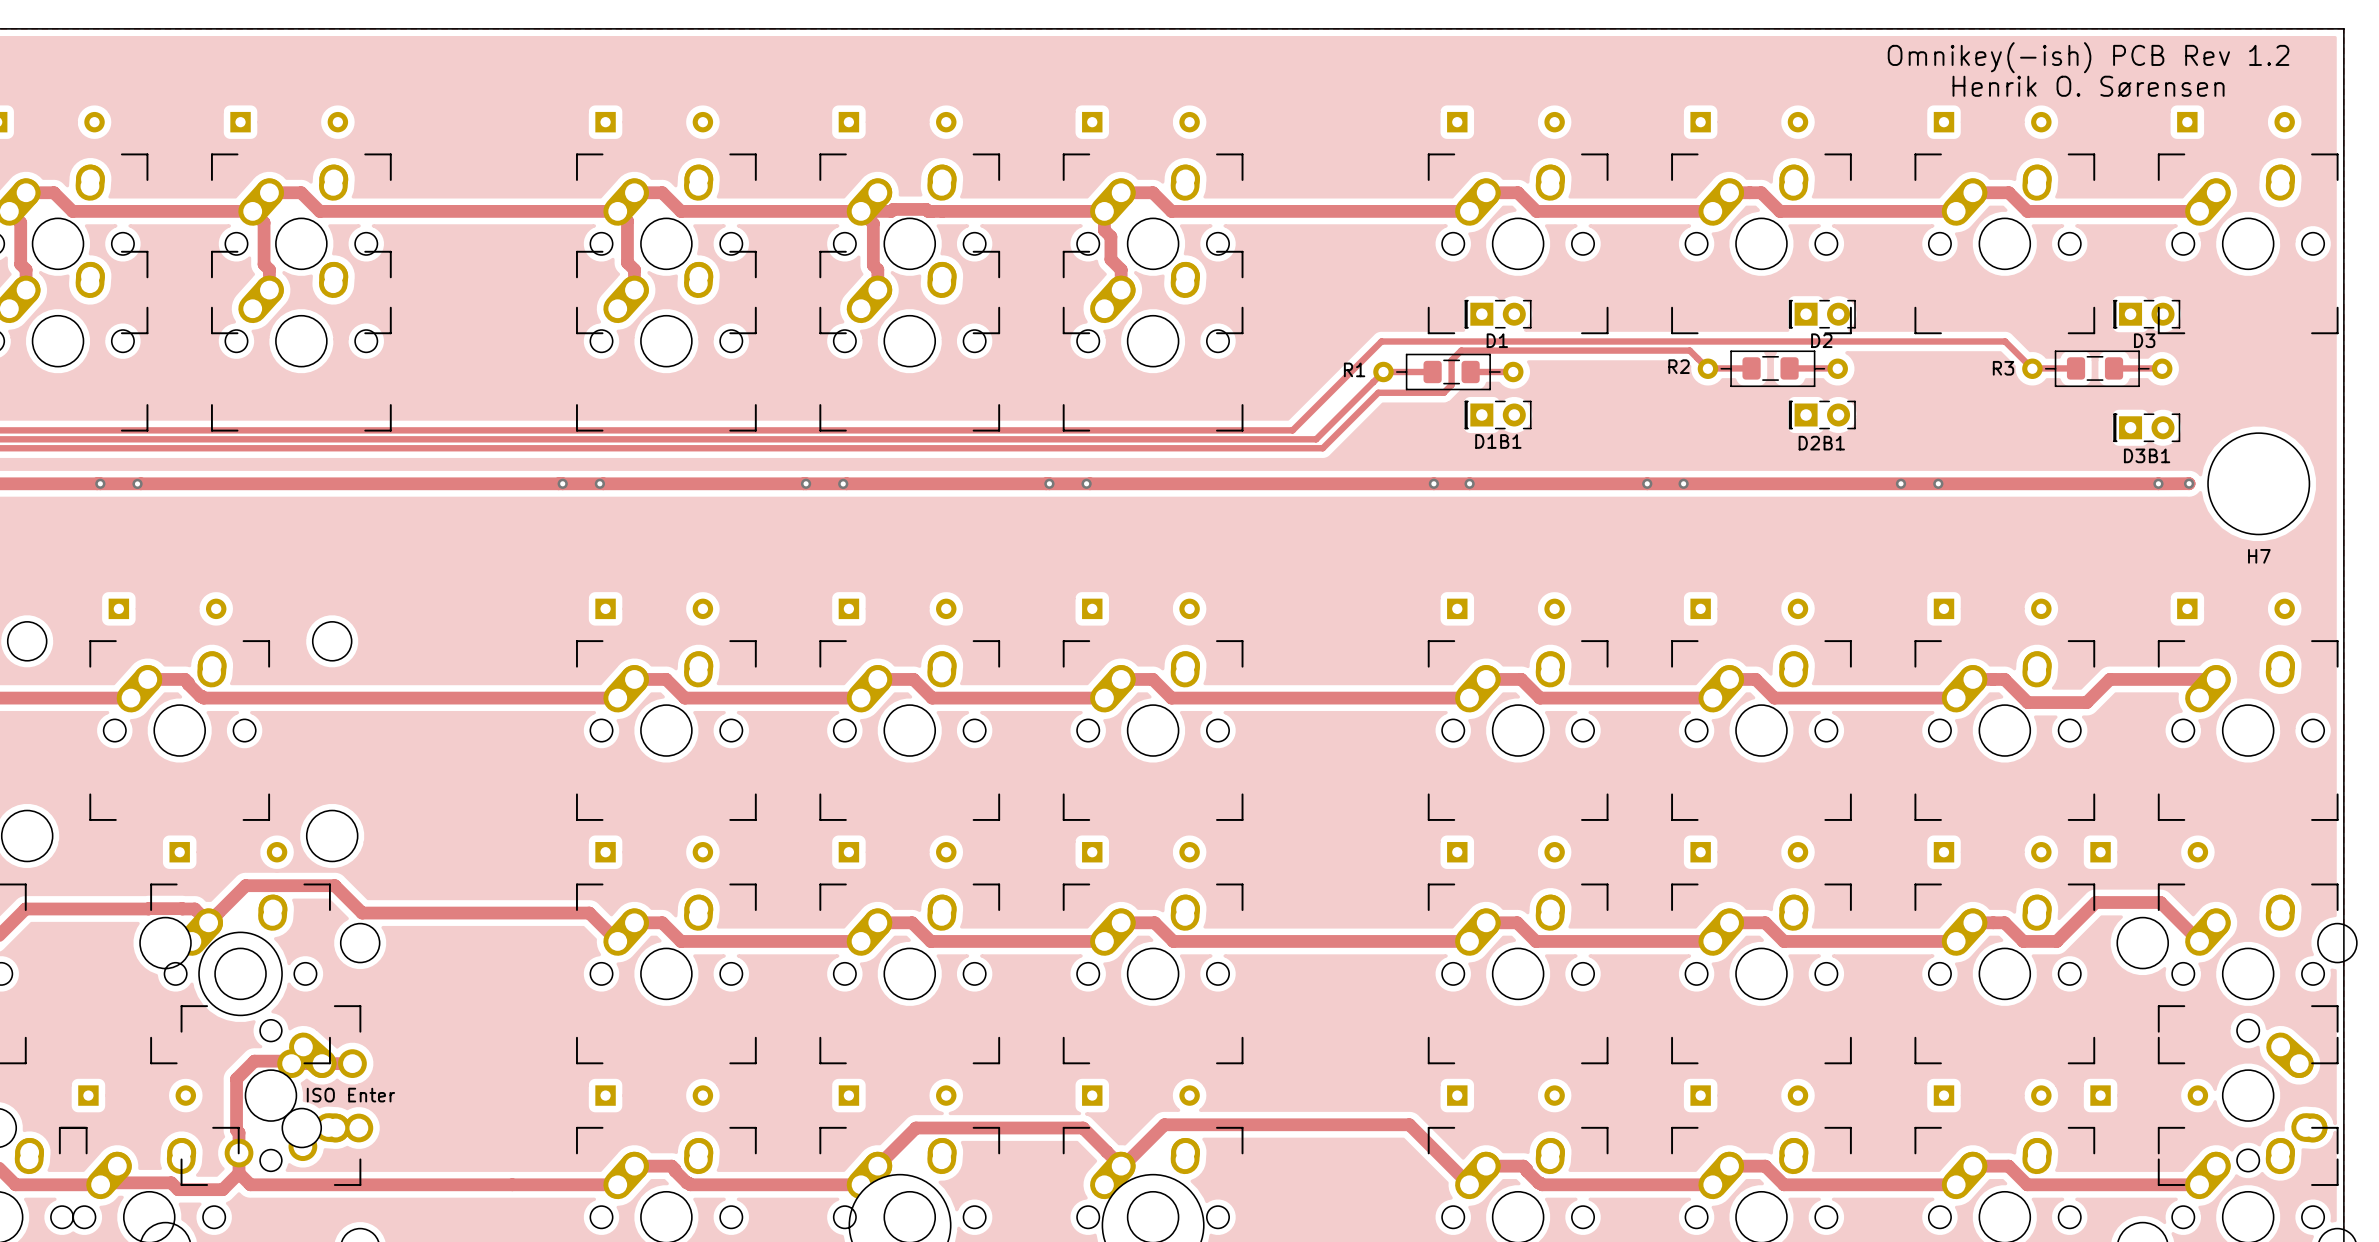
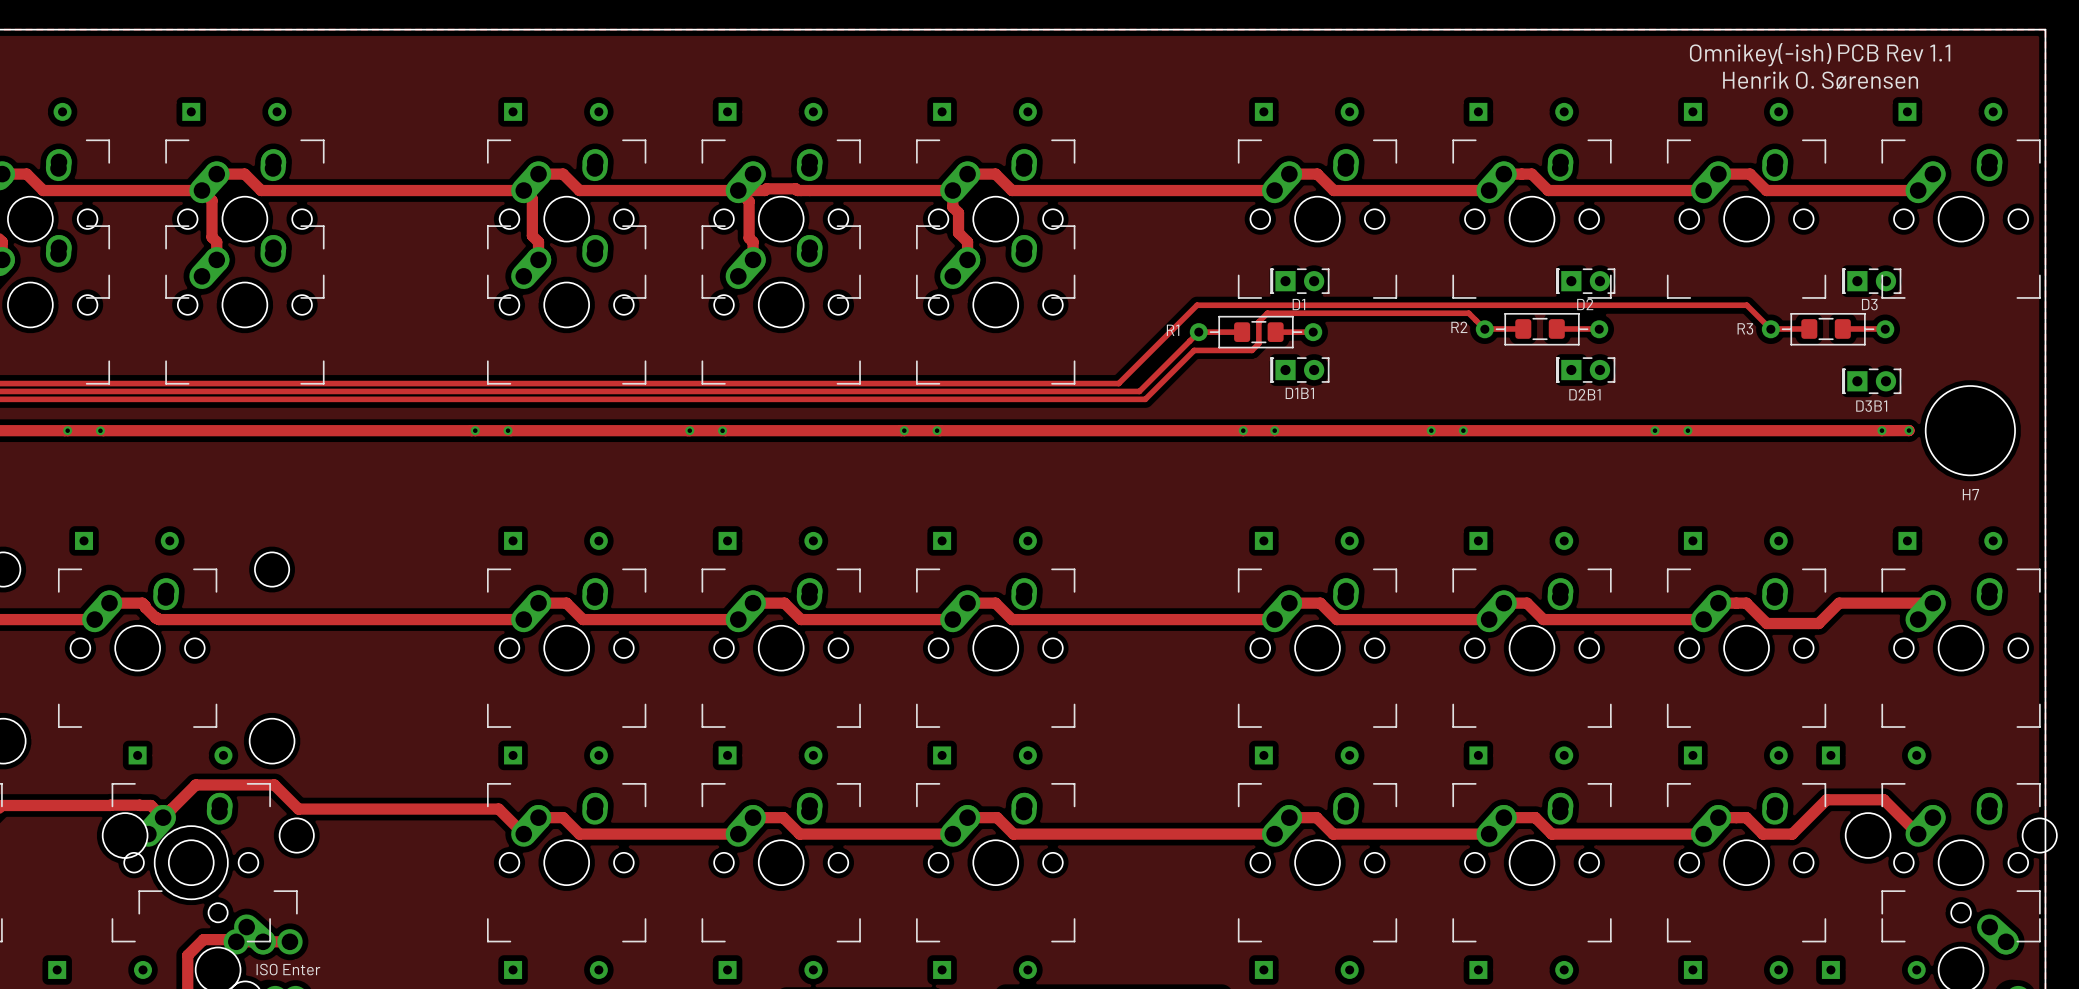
text: Omnikey(-ish) PCB Rev 1.2 (2088, 57) -> Omnikey(-ish) PCB Rev 1.1 (1820, 54)

